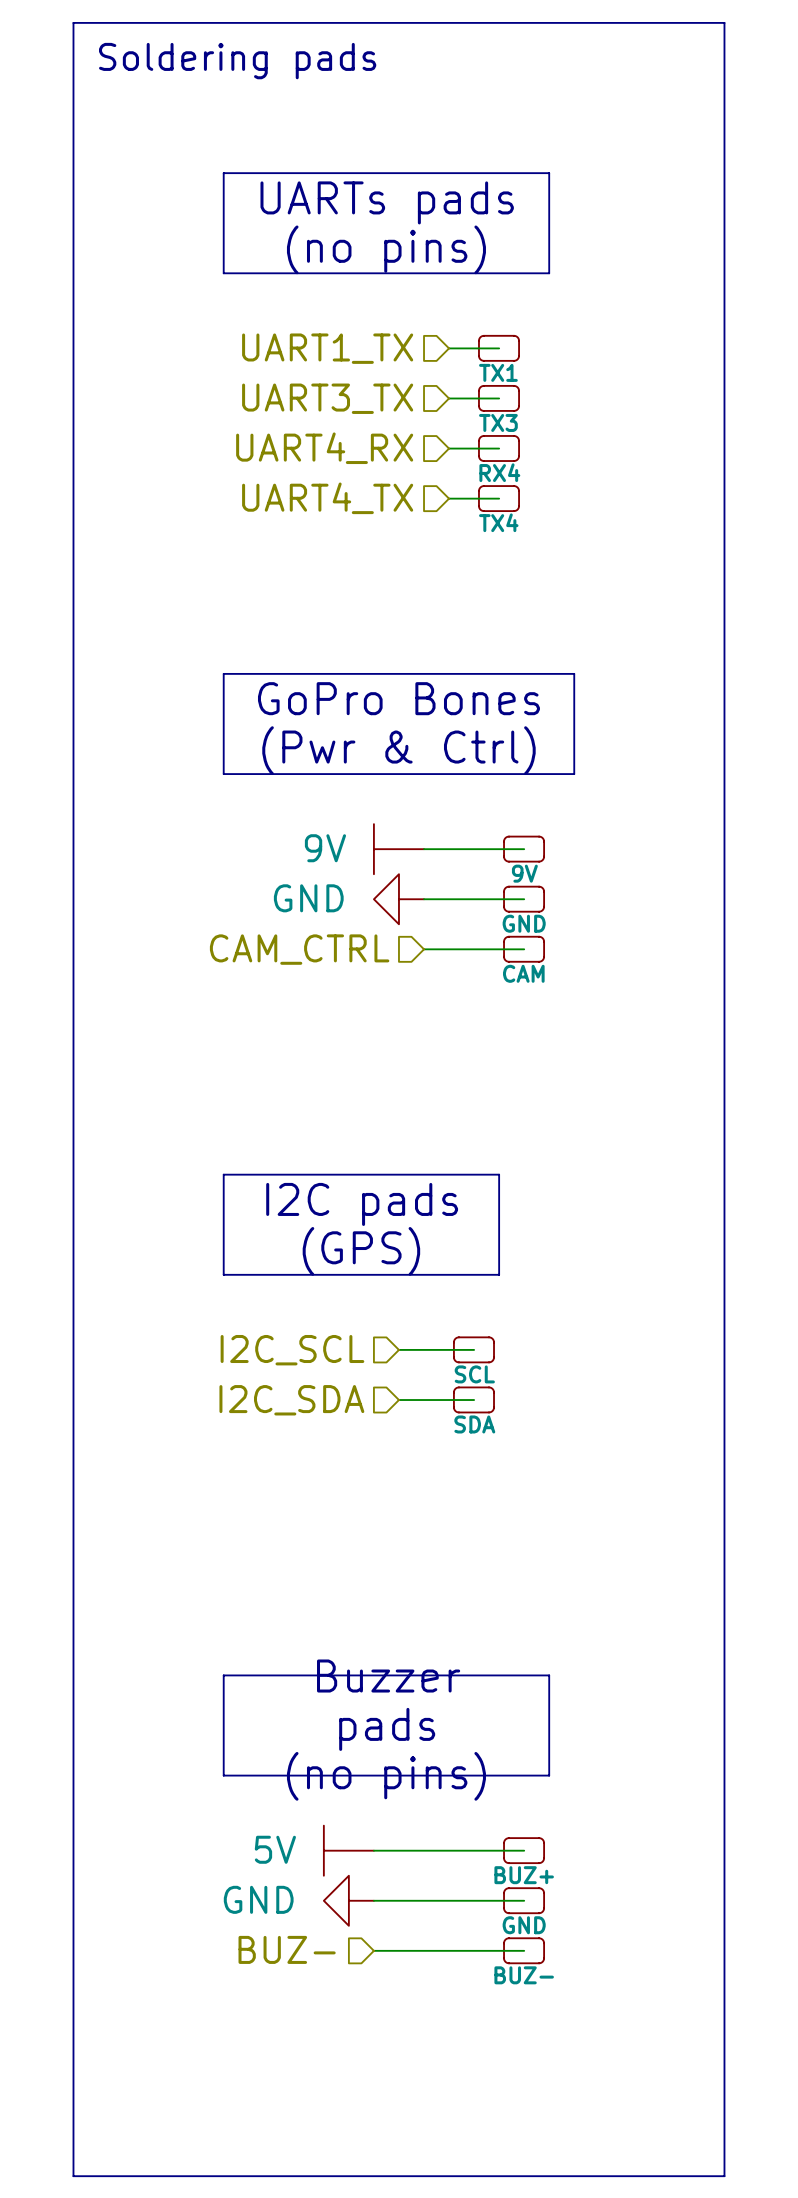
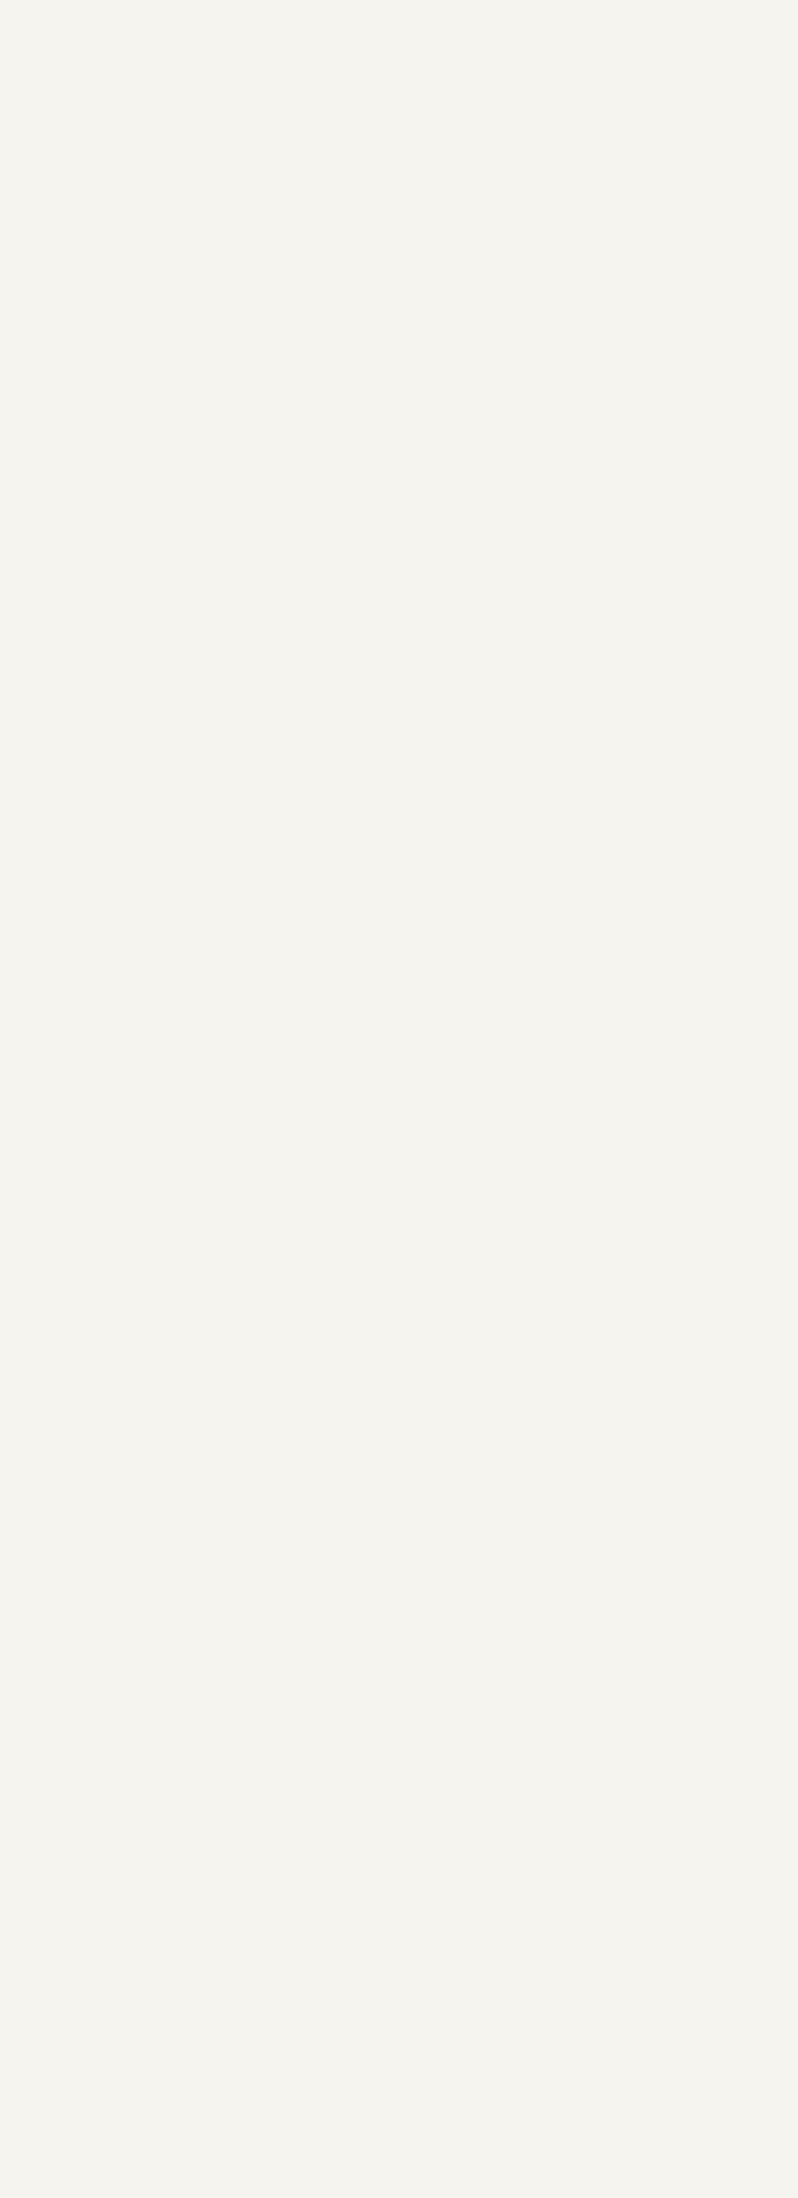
line: (73, 22) (724, 22) (724, 2176) (73, 2176) (73, 22) -> none
text: Soldering pads (237, 61) -> none
line: (223, 173) (549, 173) (549, 273) (223, 273) (223, 173) -> none
text: UARTs pads (387, 202) -> none
text: (no pins) (386, 249) -> none
hierarchical label: UART1_TX (327, 348) -> none
wire: (449, 348) (499, 348) -> none
TX1: (499, 348) -> none
hierarchical label: UART3_TX (327, 398) -> none
wire: (449, 398) (499, 398) -> none
TX3: (499, 398) -> none
hierarchical label: UART4_RX (324, 448) -> none
wire: (449, 448) (499, 448) -> none
RX4: (499, 448) -> none
hierarchical label: UART4_TX (327, 498) -> none
wire: (449, 498) (499, 498) -> none
TX4: (499, 498) -> none
line: (223, 673) (223, 774) (574, 774) (574, 673) (223, 673) -> none
text: GoPro Bones (398, 698) -> none
text: (Pwr & Ctrl) (398, 750) -> none
power symbol: 9V (398, 849) -> none
wire: (424, 849) (524, 849) -> none
9V: (524, 849) -> none
power symbol: GND (398, 899) -> none
wire: (424, 899) (524, 899) -> none
GND: (524, 899) -> none
hierarchical label: CAM_CTRL (299, 949) -> none
wire: (424, 949) (524, 949) -> none
CAM: (524, 949) -> none
line: (223, 1174) (223, 1274) (499, 1274) (499, 1174) (223, 1174) -> none
text: I2C pads (362, 1204) -> none
text: (GPS) (361, 1251) -> none
wire: (398, 1349) (474, 1349) -> none
SCL: (473, 1349) -> none
hierarchical label: I2C_SCL (292, 1350) -> none
SDA: (473, 1399) -> none
hierarchical label: I2C_SDA (291, 1400) -> none
wire: (398, 1400) (474, 1400) -> none
line: (223, 1675) (223, 1775) (549, 1775) (549, 1675) (223, 1675) -> none
text: Buzzer (388, 1676) -> none
text: pads (387, 1729) -> none
text: (no pins) (386, 1776) -> none
power symbol: 5V (348, 1850) -> none
wire: (373, 1850) (524, 1850) -> none
BUZ+: (524, 1850) -> none
power symbol: GND (348, 1900) -> none
wire: (373, 1900) (524, 1900) -> none
GND: (524, 1900) -> none
hierarchical label: BUZ- (287, 1949) -> none
wire: (373, 1950) (524, 1950) -> none
BUZ-: (524, 1950) -> none

